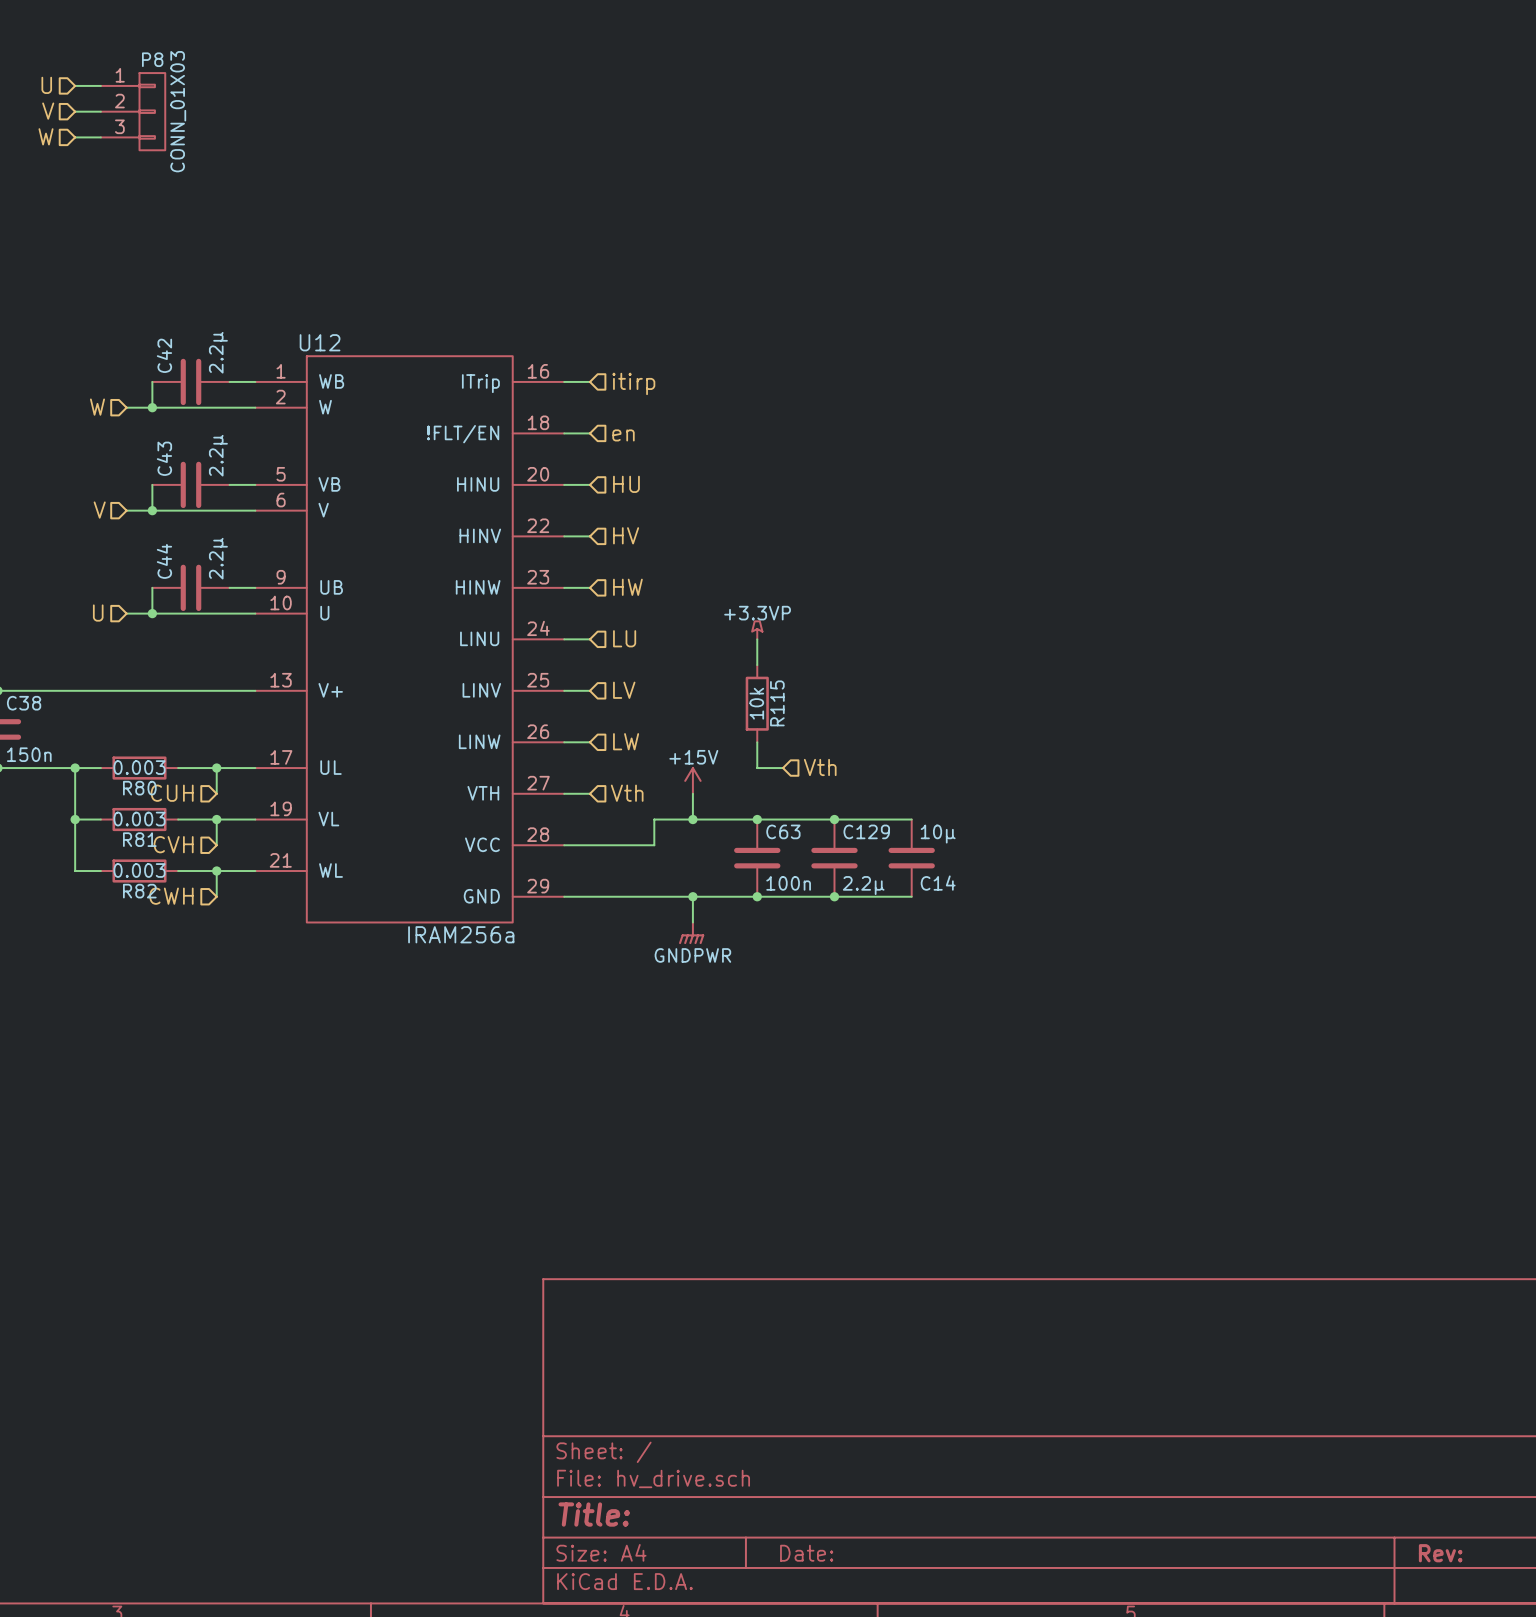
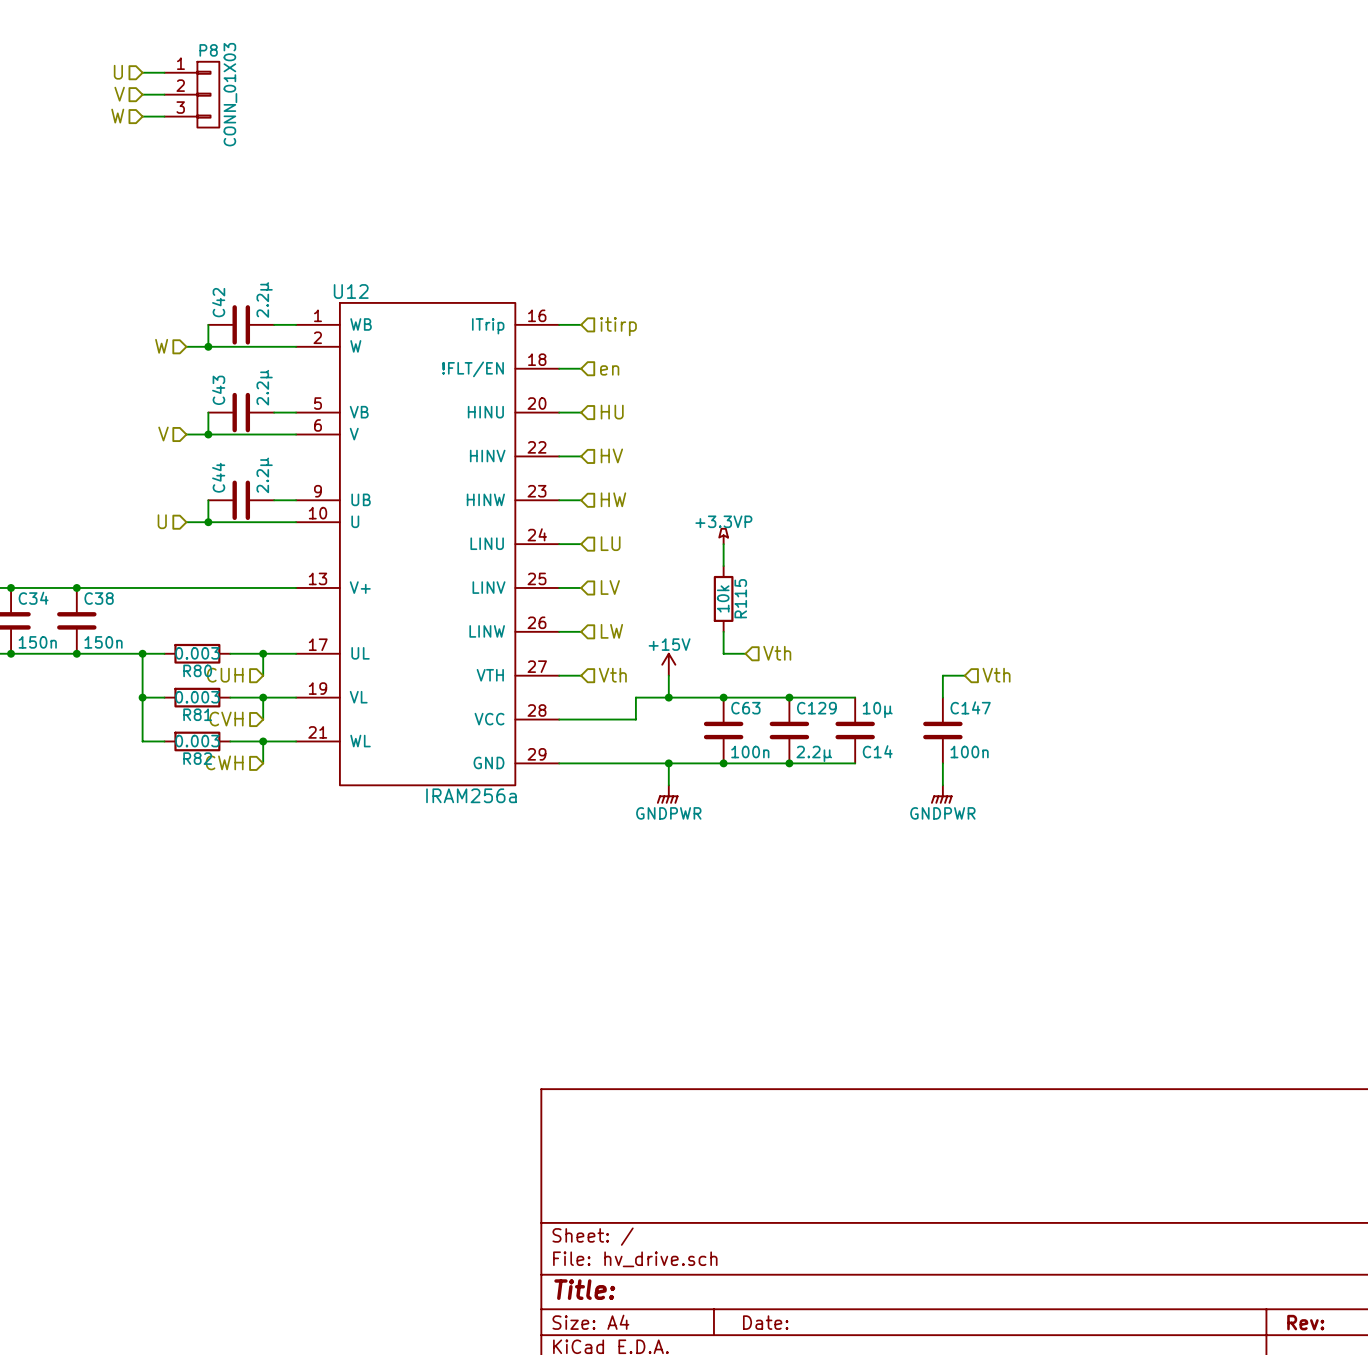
wire: none -> (964, 675) (942, 675) (942, 697)
hierarchical label: none -> Vth (996, 675)
C147: none -> 100n (942, 730)
wire: none -> (942, 763) (942, 785)
power symbol: none -> GNDPWR (941, 794)

